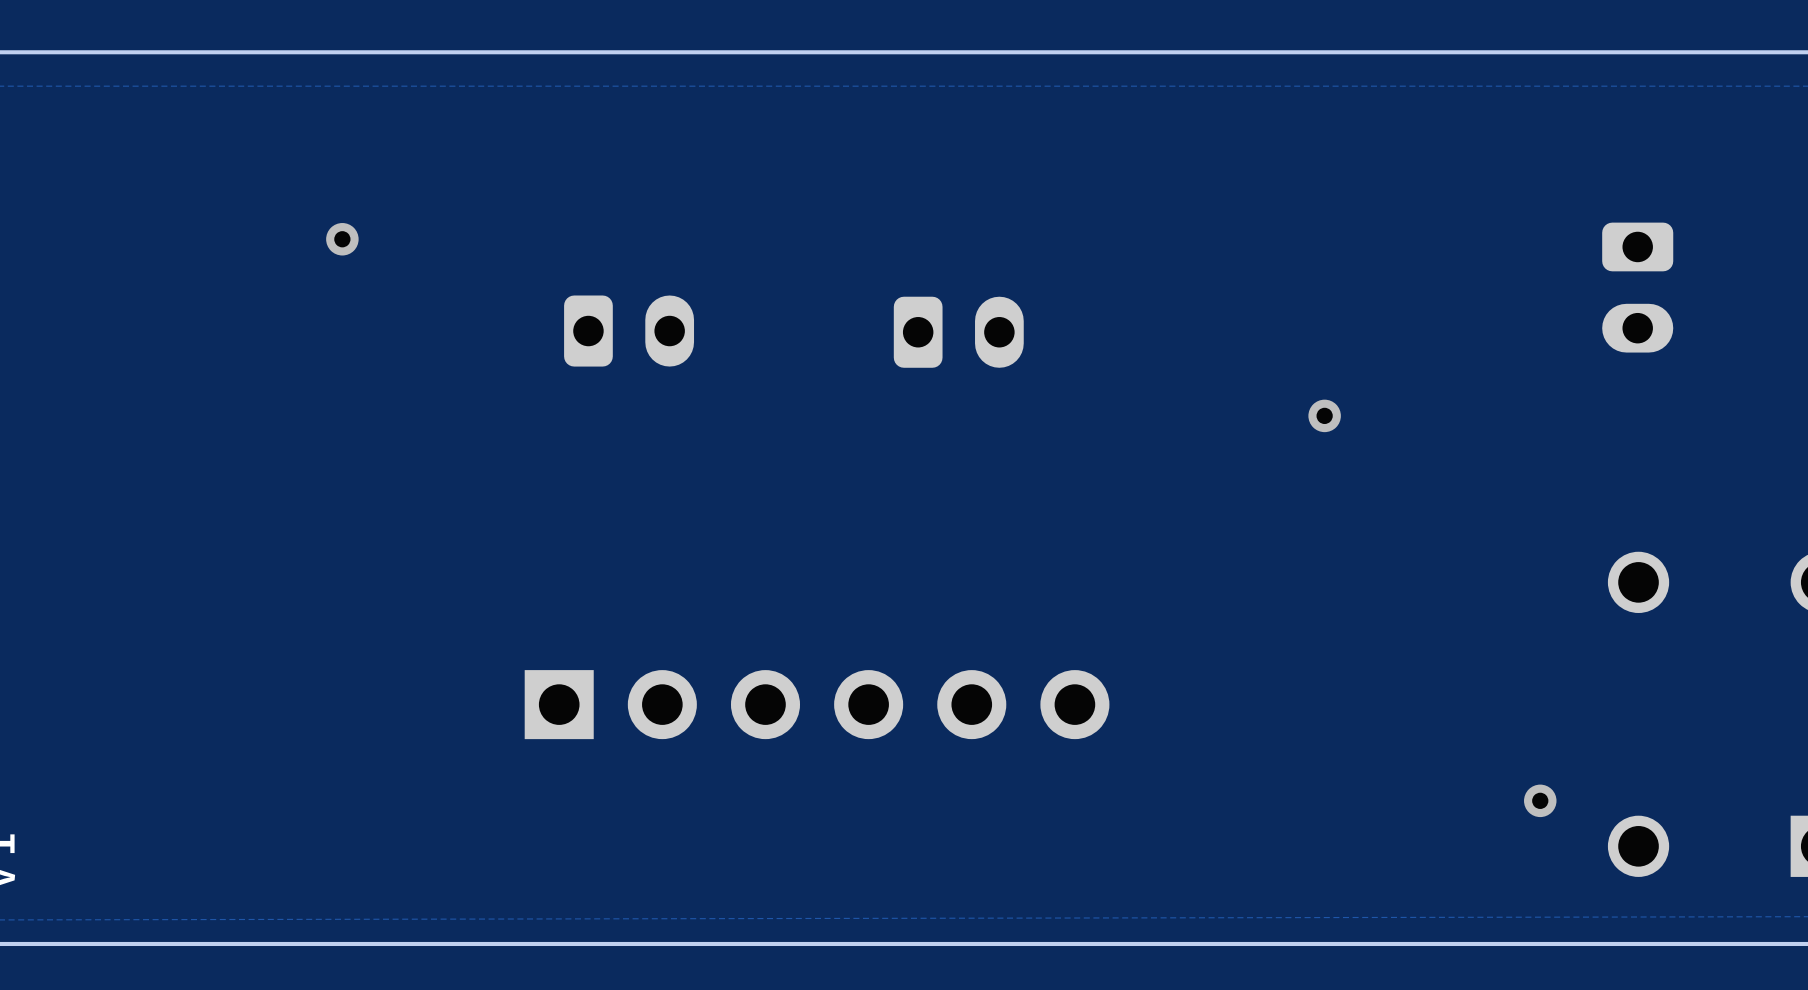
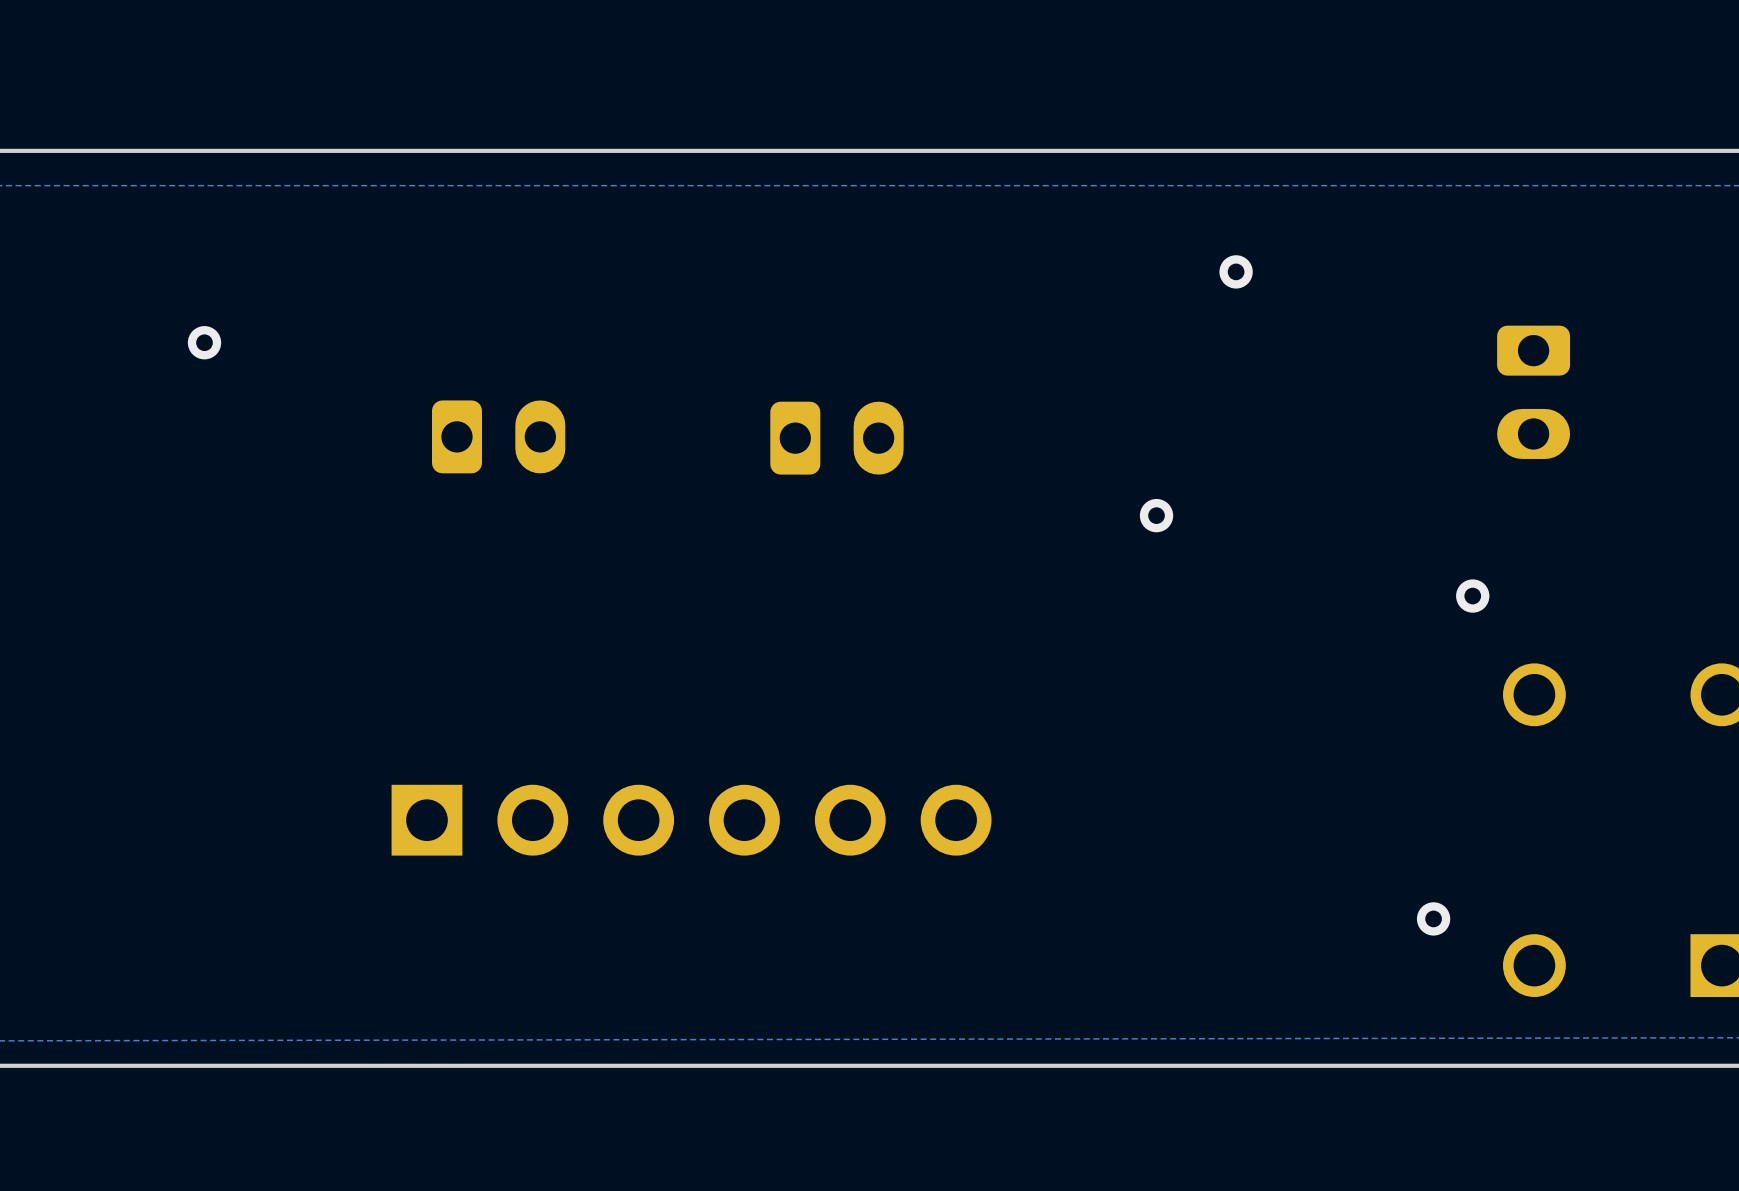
via: none -> (1236, 271)
via position: (1324, 415) -> (1156, 515)
via: none -> (1472, 596)

